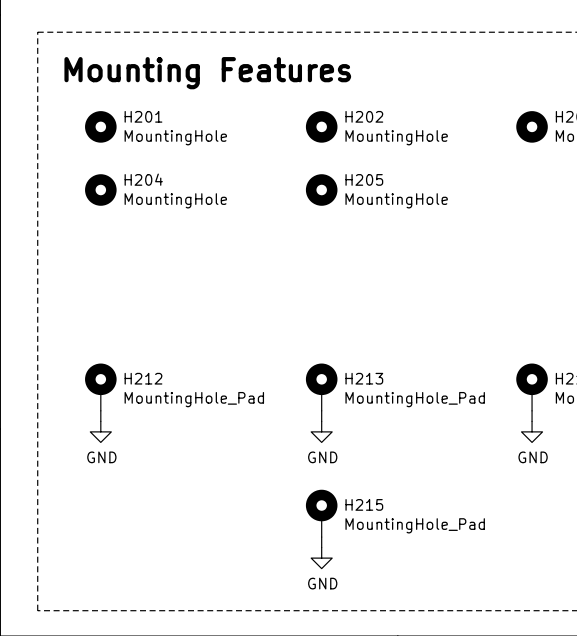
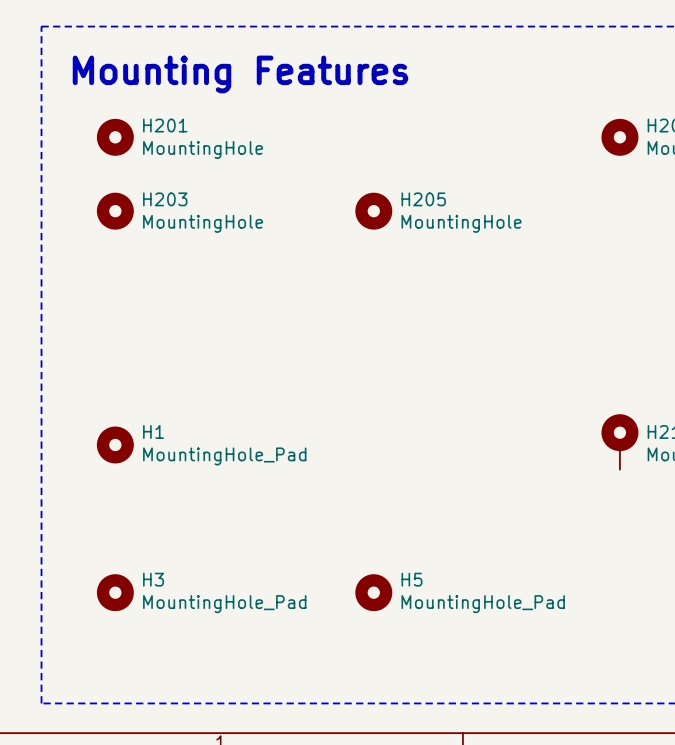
H202: MountingHole (321, 126) -> none
H204 name: H204 (143, 179) -> H203 (165, 199)
H212: MountingHole_Pad (100, 387) -> none
H213: MountingHole_Pad (321, 387) -> none
H1: none -> MountingHole_Pad (115, 445)
wire: (100, 410) (100, 421) -> none
wire: (321, 410) (321, 421) -> none
wire: (532, 410) (532, 421) -> none
power symbol: GND (100, 431) -> none
power symbol: GND (321, 431) -> none
power symbol: GND (532, 431) -> none
H215: MountingHole_Pad (321, 513) -> none
H3: none -> MountingHole_Pad (115, 592)
H5: none -> MountingHole_Pad (373, 592)
wire: (321, 537) (321, 547) -> none
power symbol: GND (321, 558) -> none

